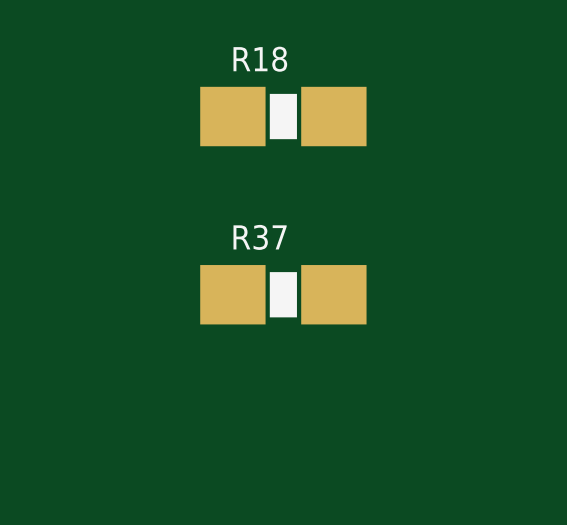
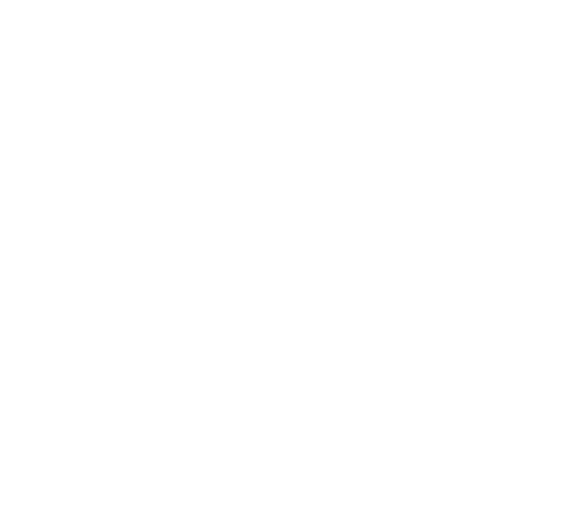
R18: (283, 116) -> none
R37: (283, 294) -> none

